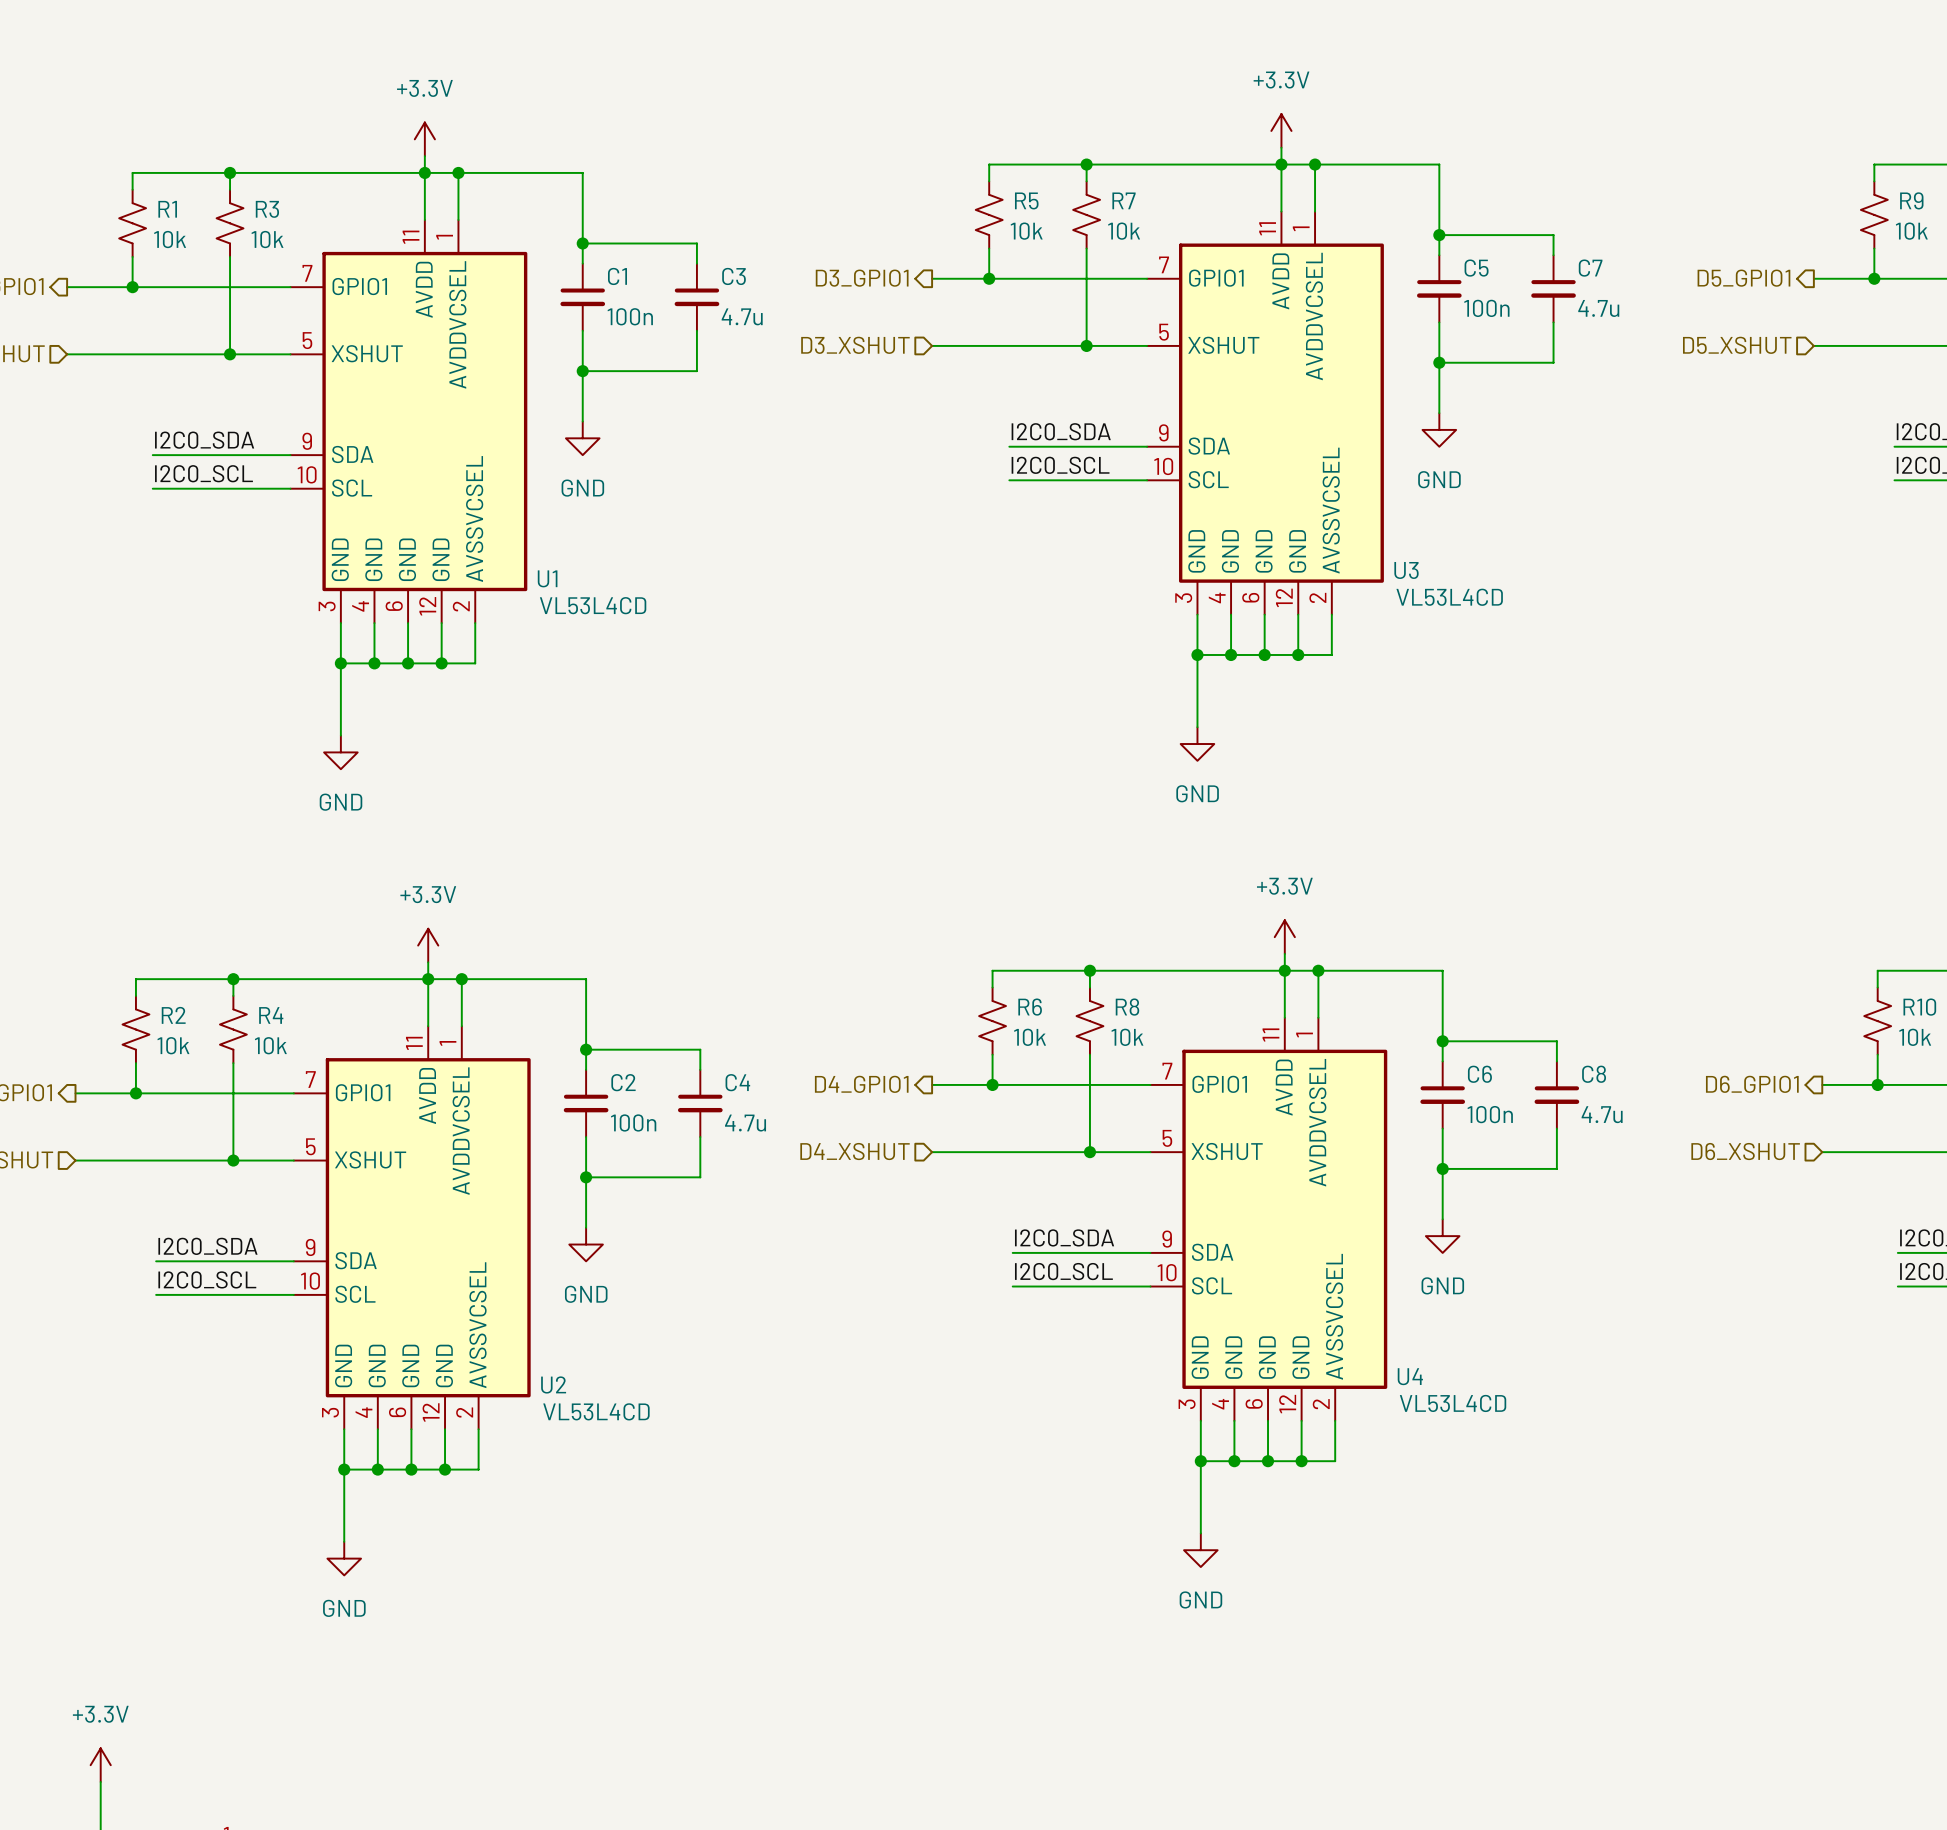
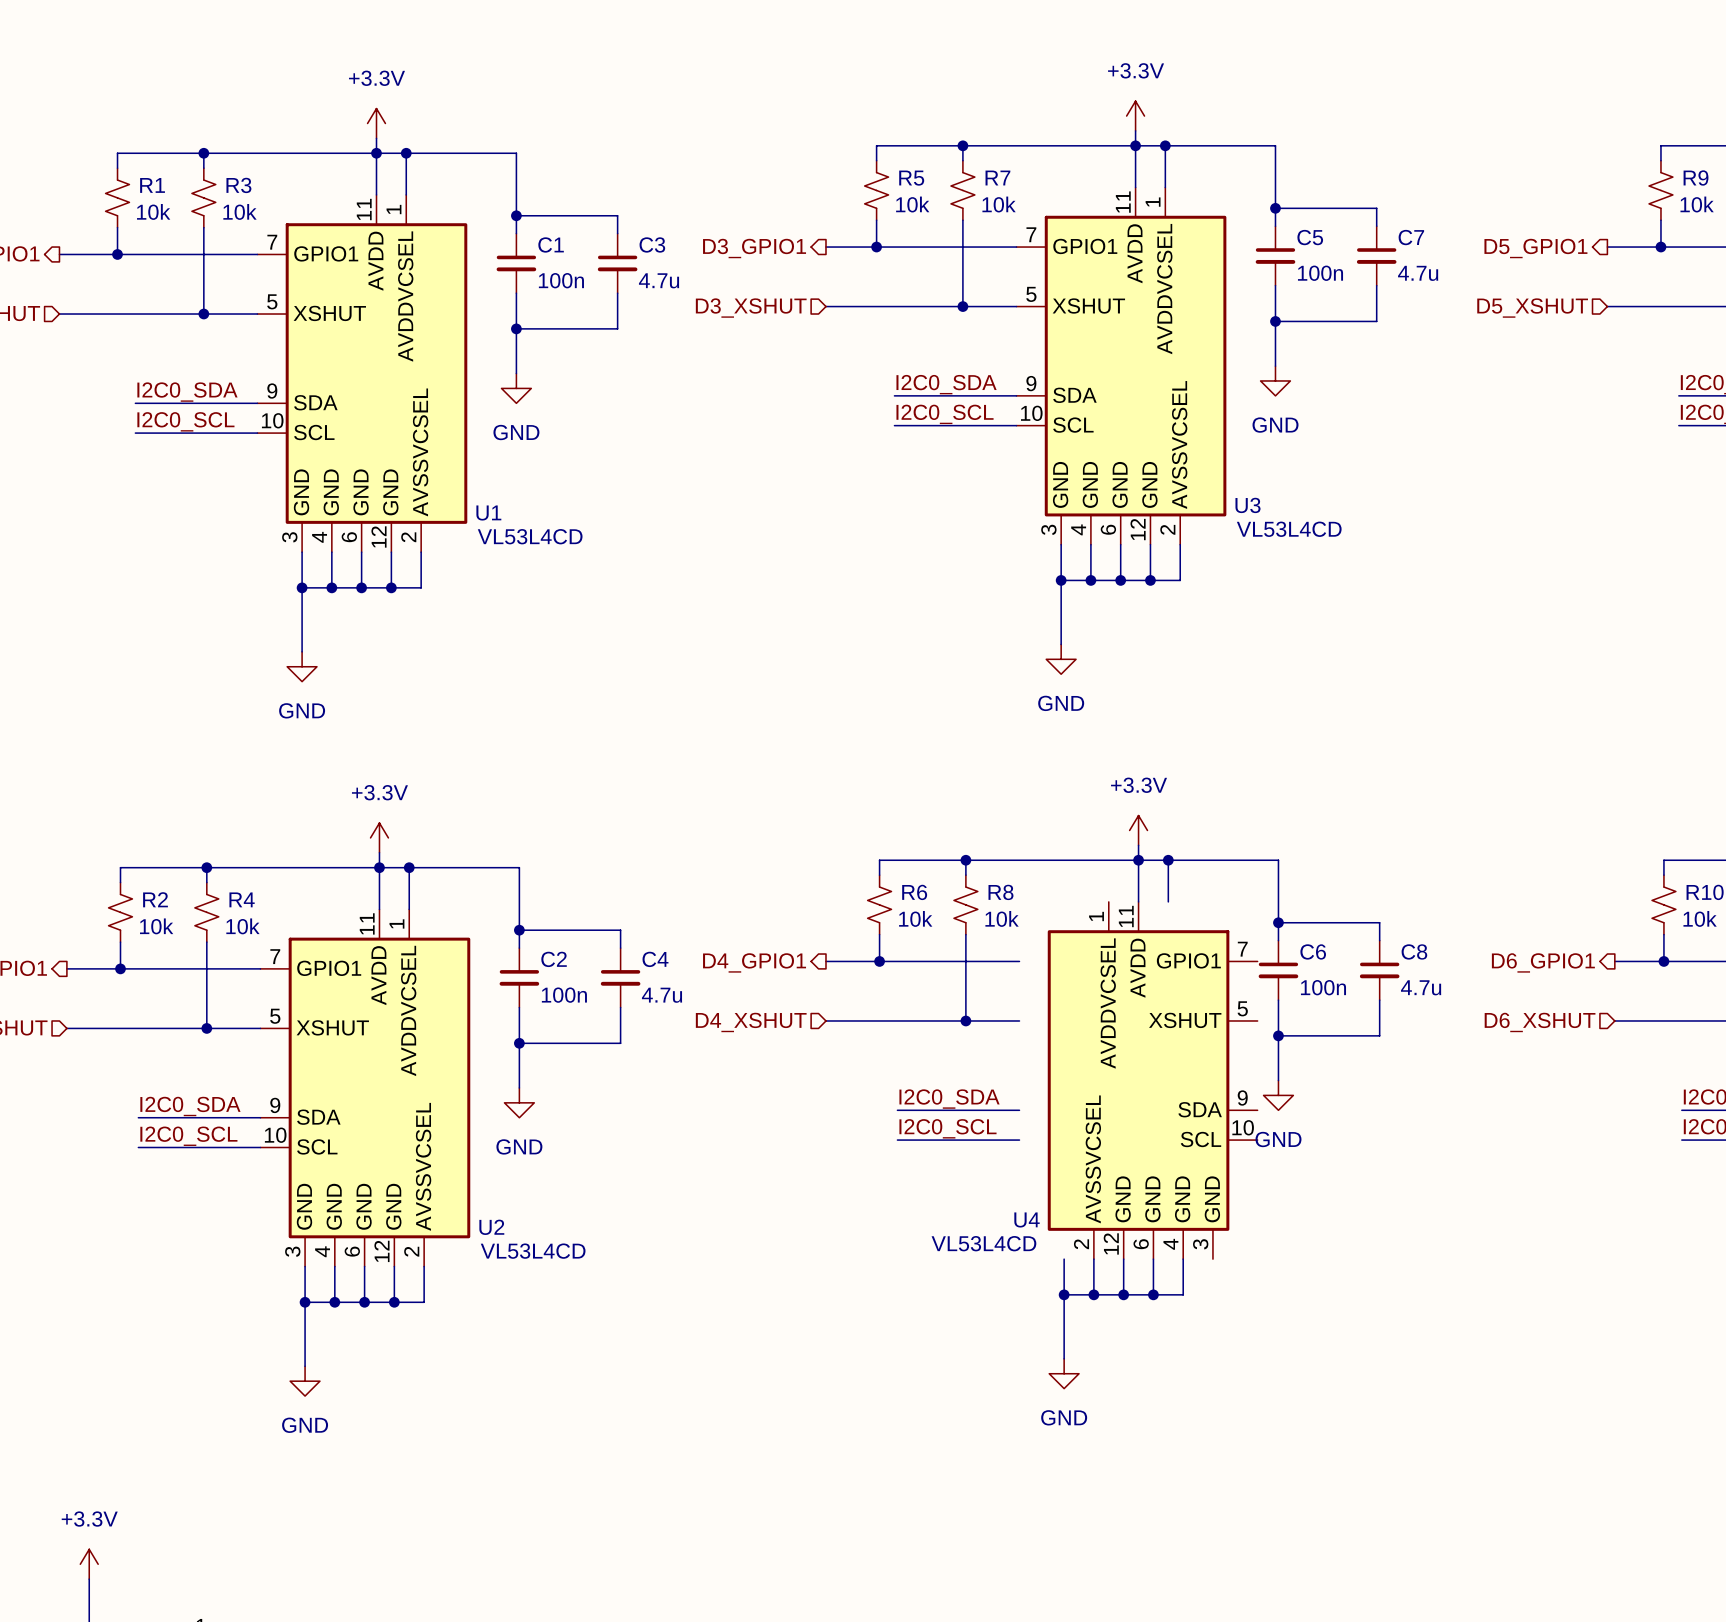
U4 flip: as is (1284, 1219) -> left-right (1138, 1080)

